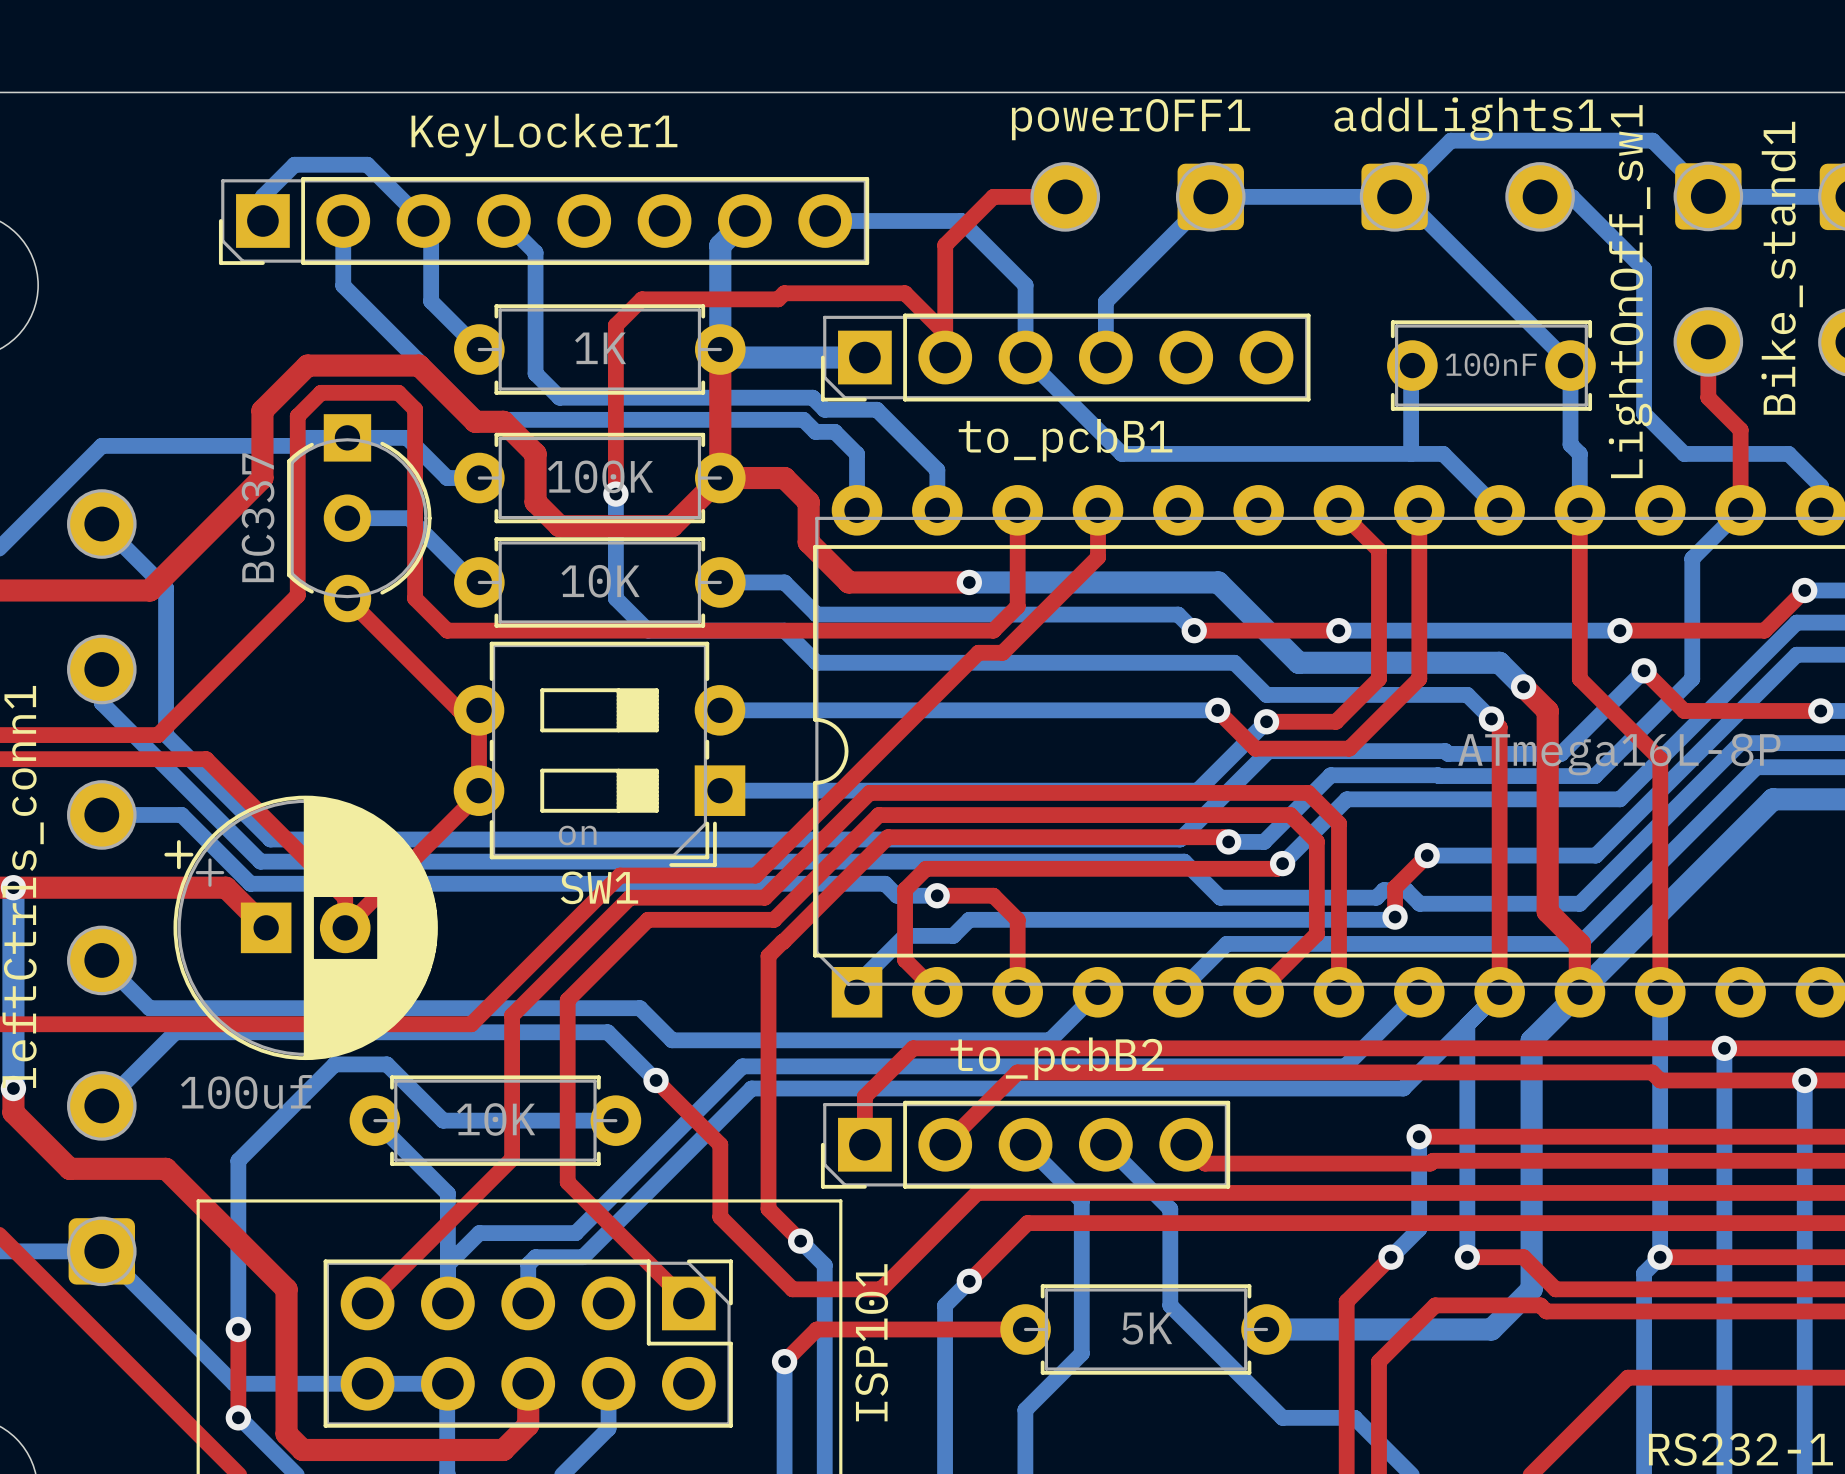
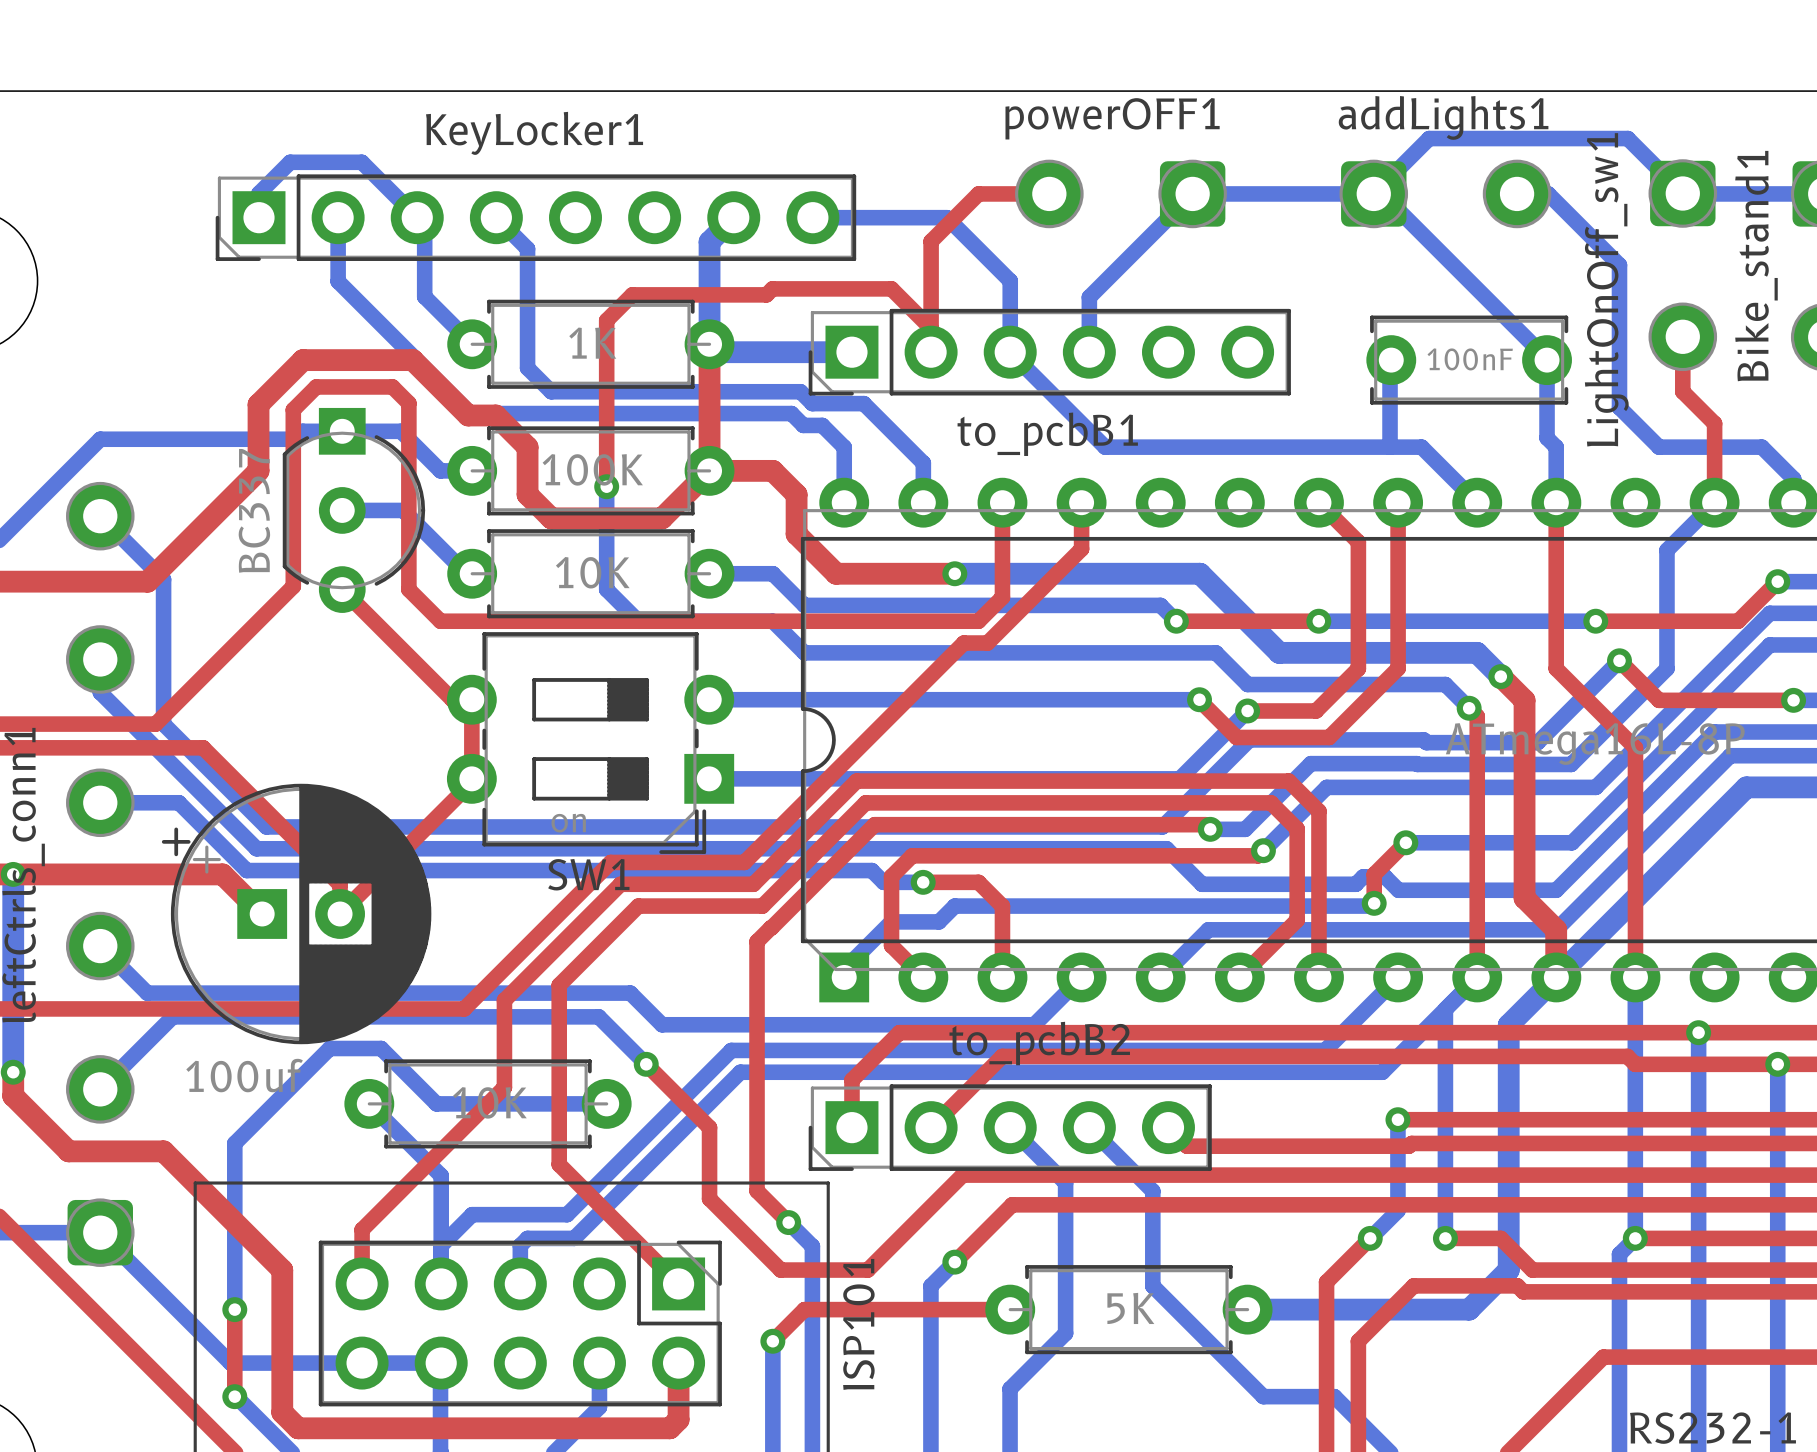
top track: (512, 1103) (512, 1158) (367, 1303) -> (504, 1087) (362, 1229) (362, 1283)
top track: (528, 1383) (528, 1425) (503, 1449) -> (678, 1363) (678, 1419) (669, 1428) (495, 1428)

